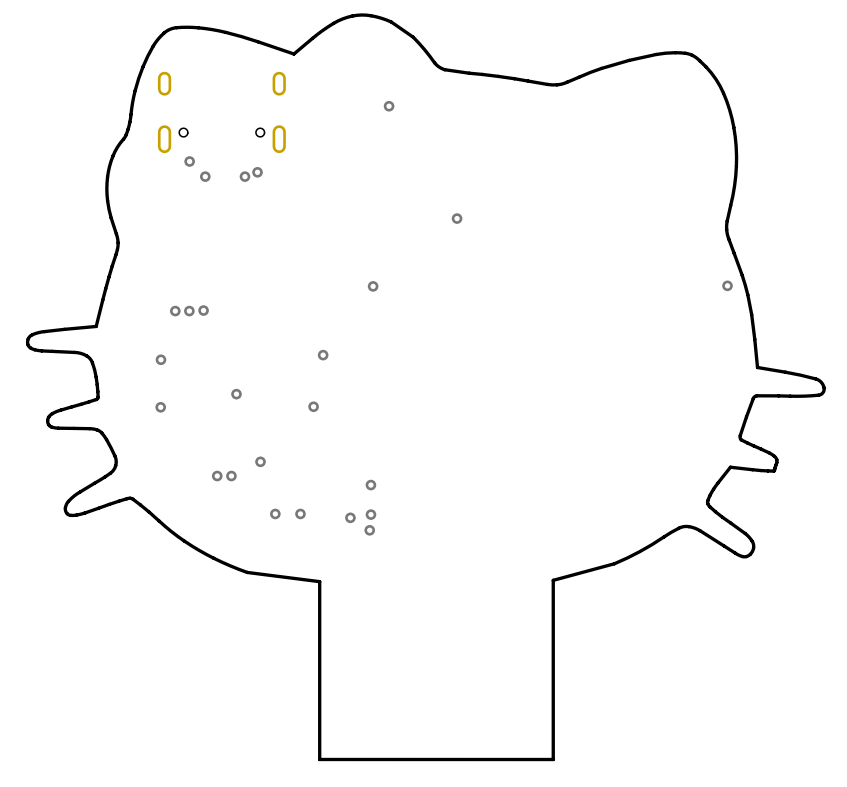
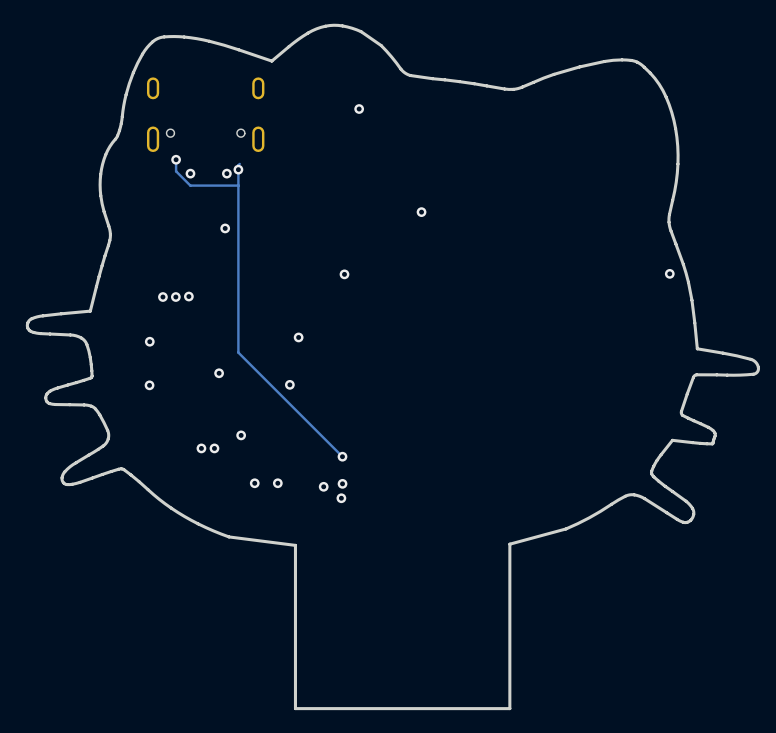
track: none -> (176, 163) (176, 171) (190, 185) (238, 185)
track: none -> (239, 163) (238, 352) (342, 456)
via: none -> (225, 228)

